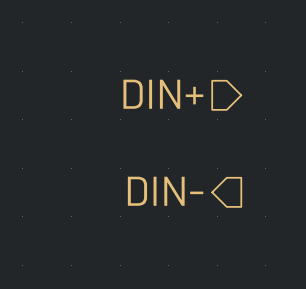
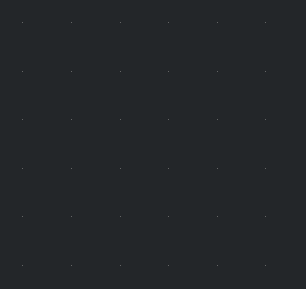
hierarchical label: DIN+ (163, 94) -> none
hierarchical label: DIN- (165, 191) -> none

